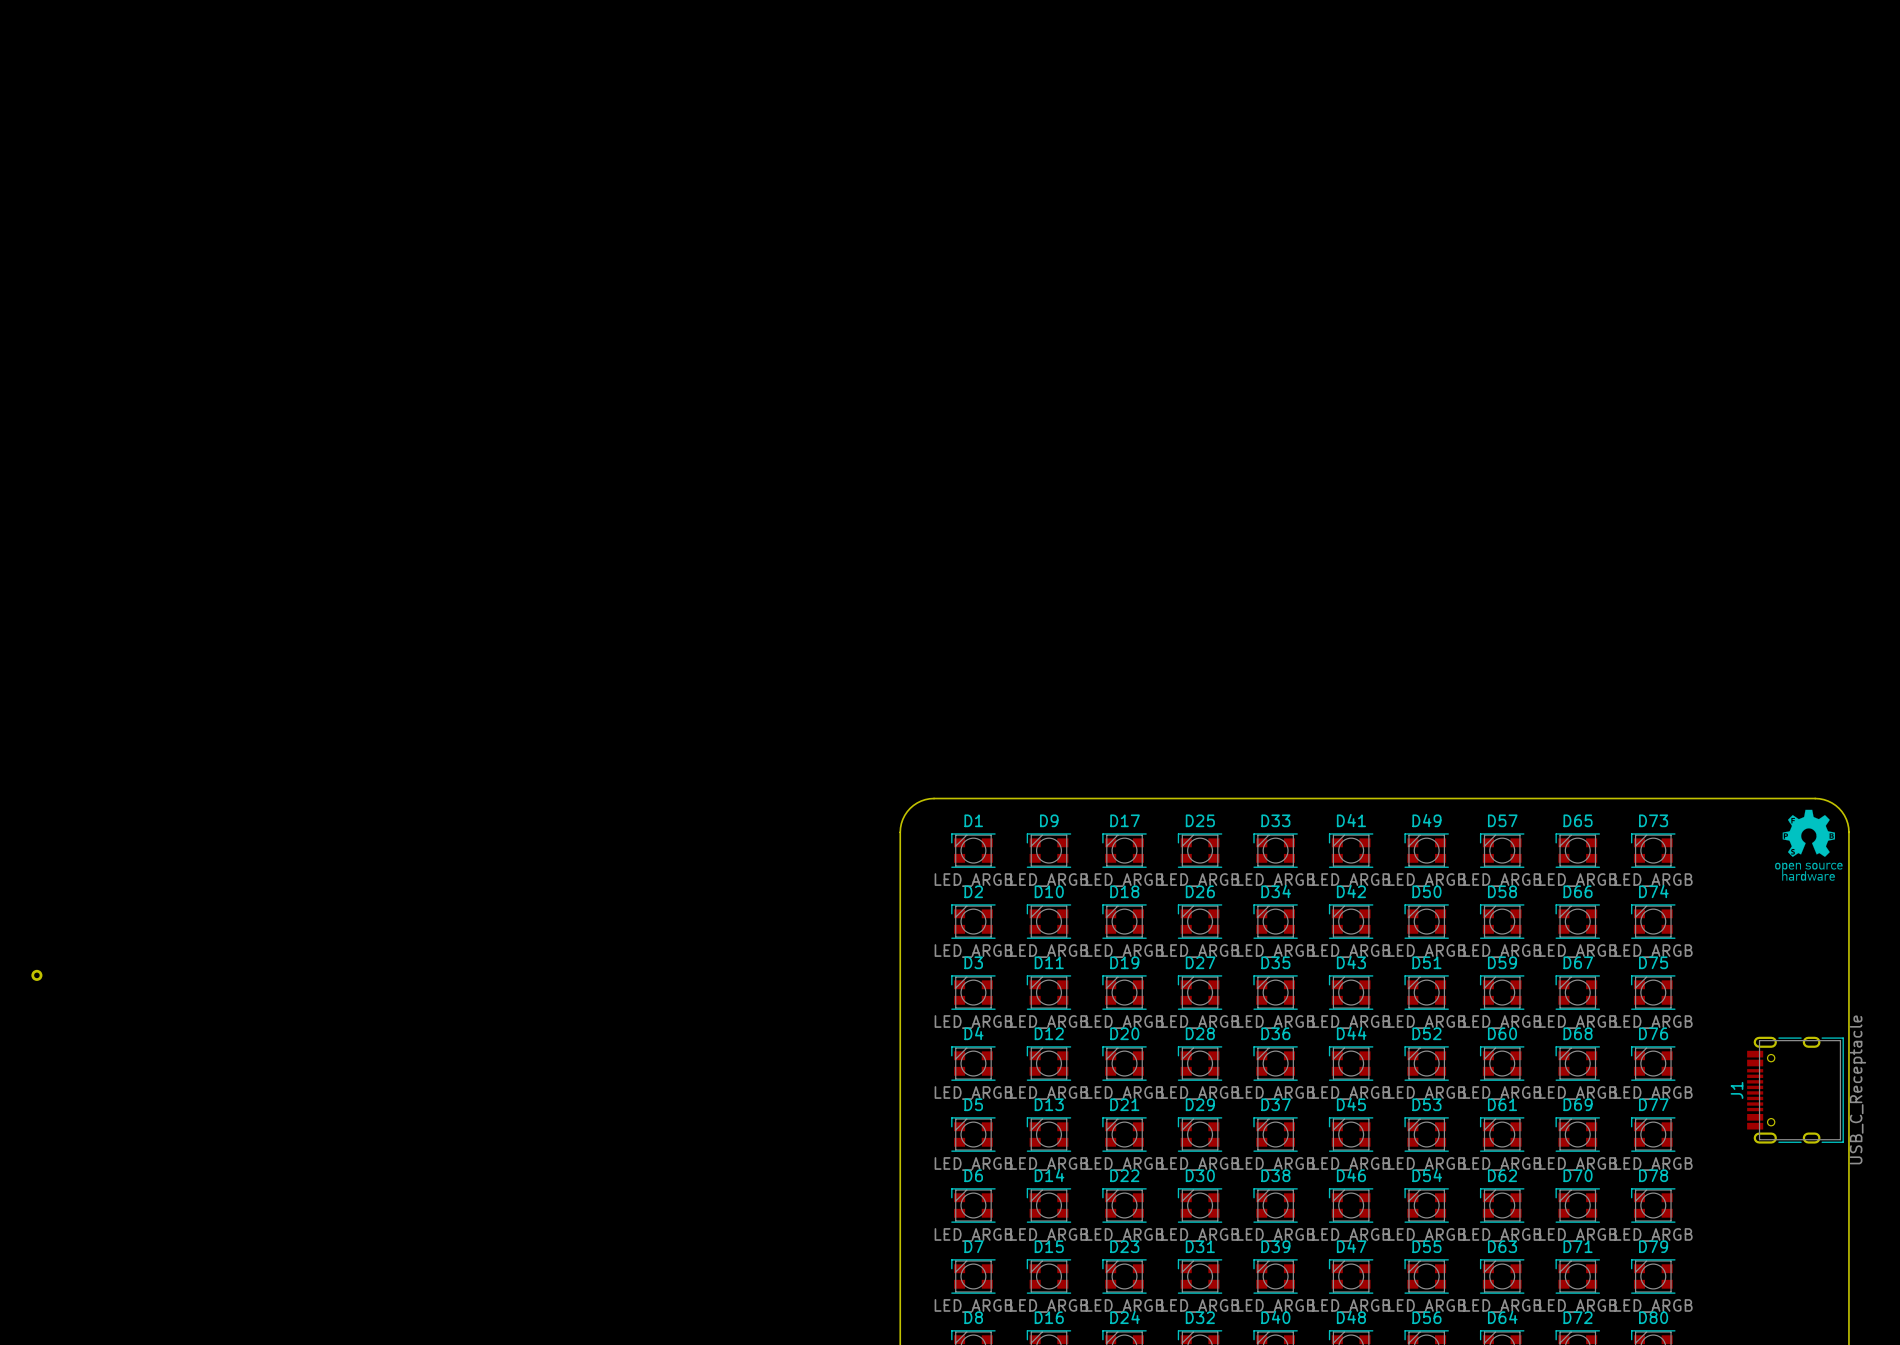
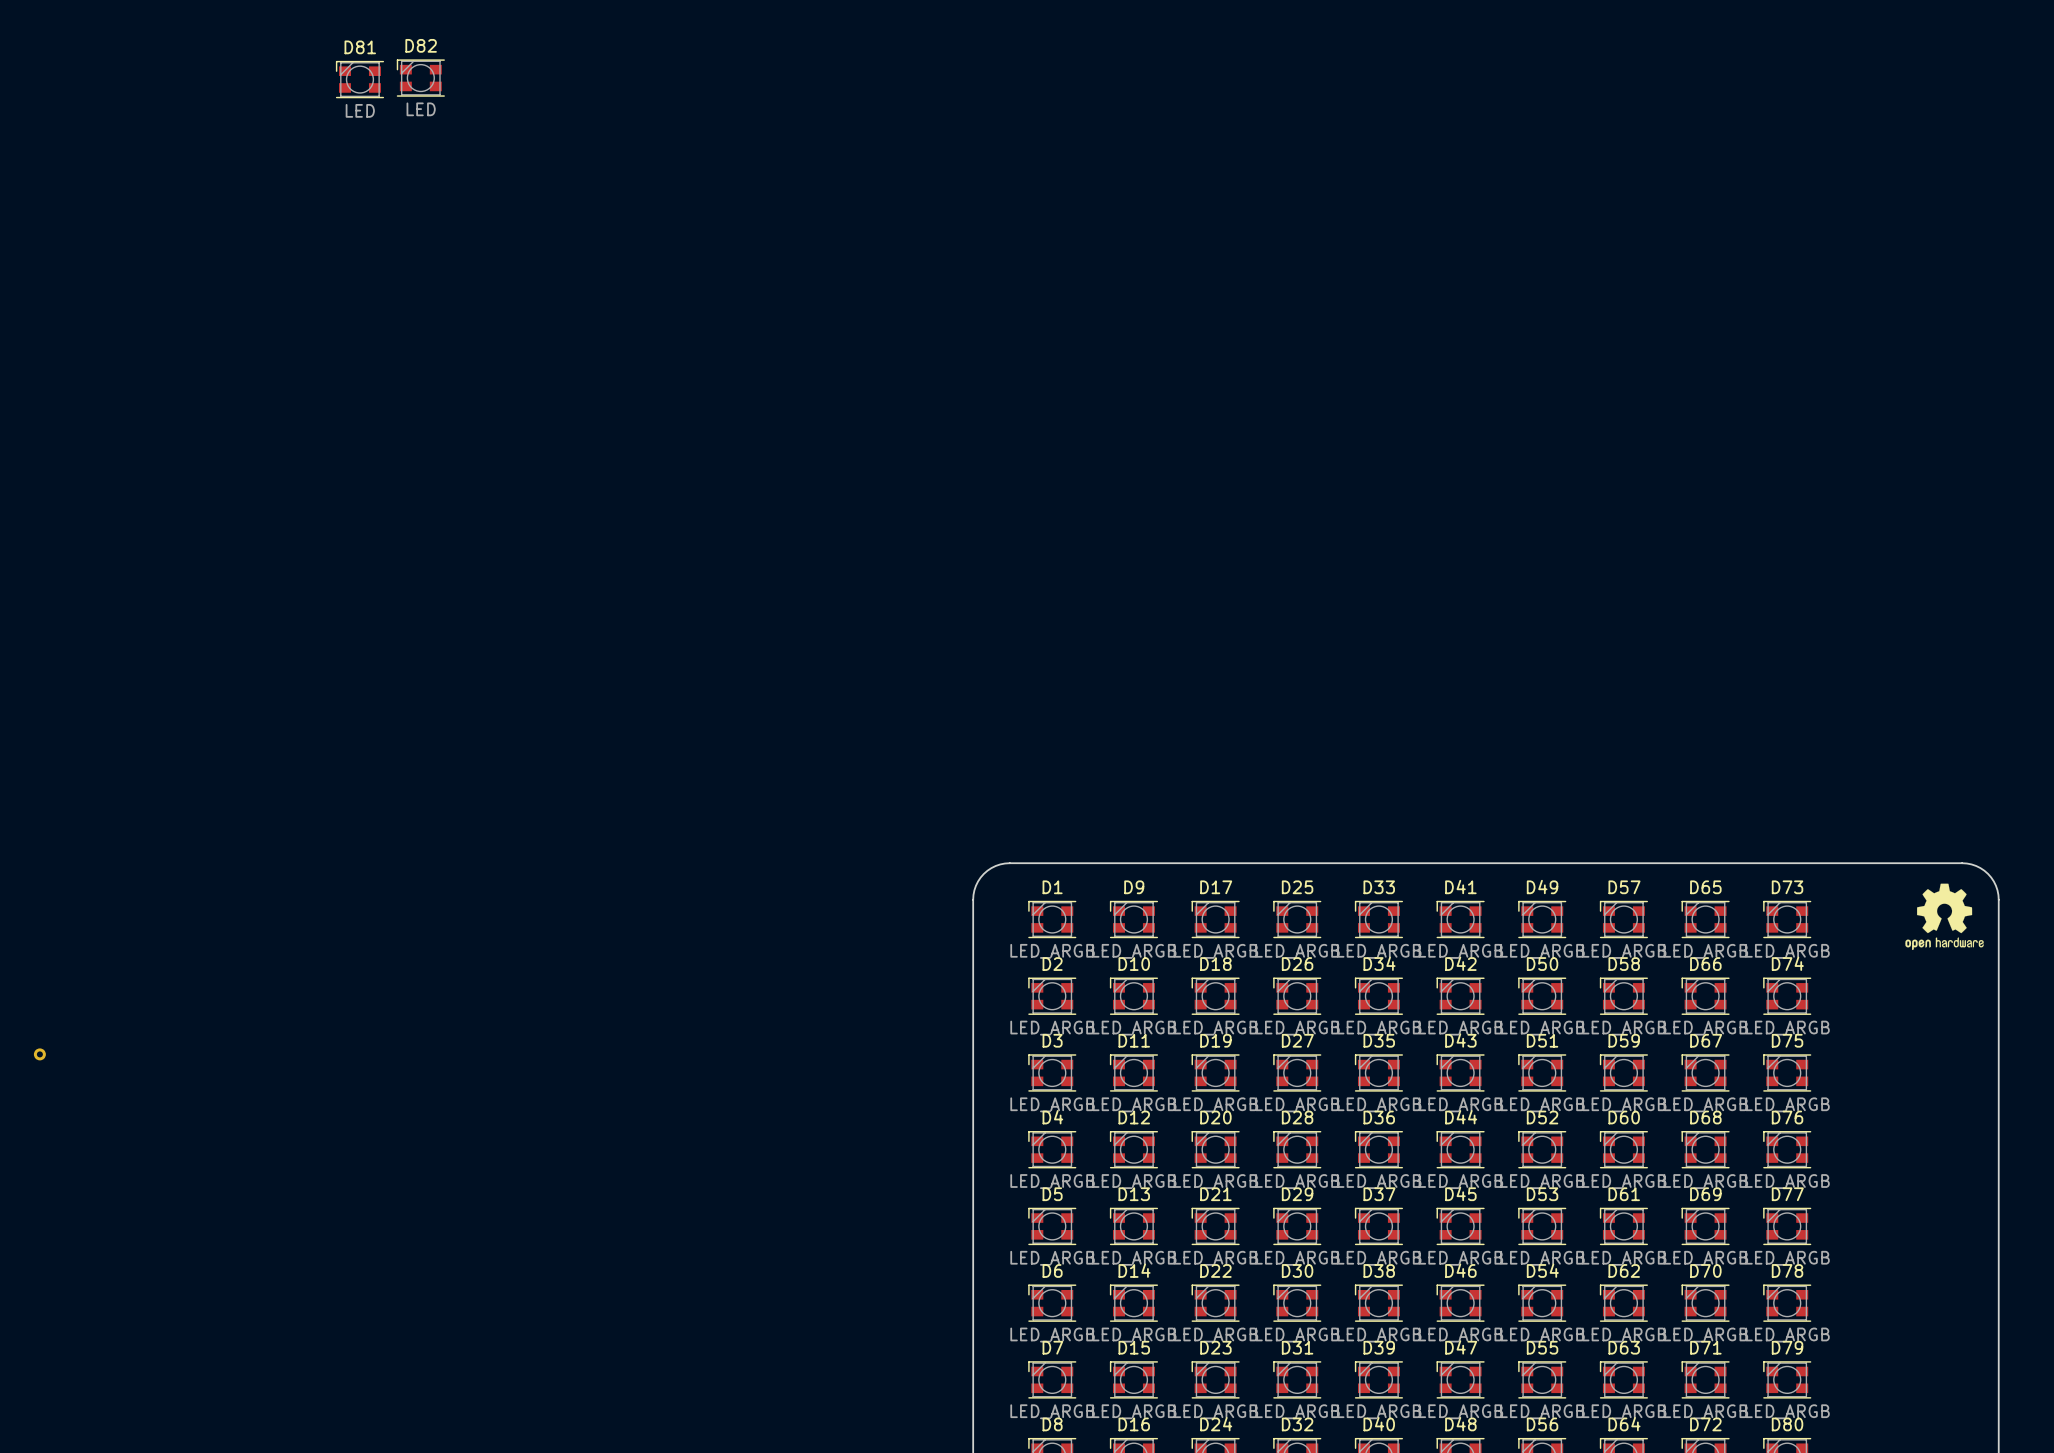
D82: none -> LED (420, 78)
D81: none -> LED (359, 79)
drawing shape: [1775, 809, 1843, 881] -> [1905, 883, 1984, 951]
J1: USB_C_Receptacle (1795, 1090) -> none

